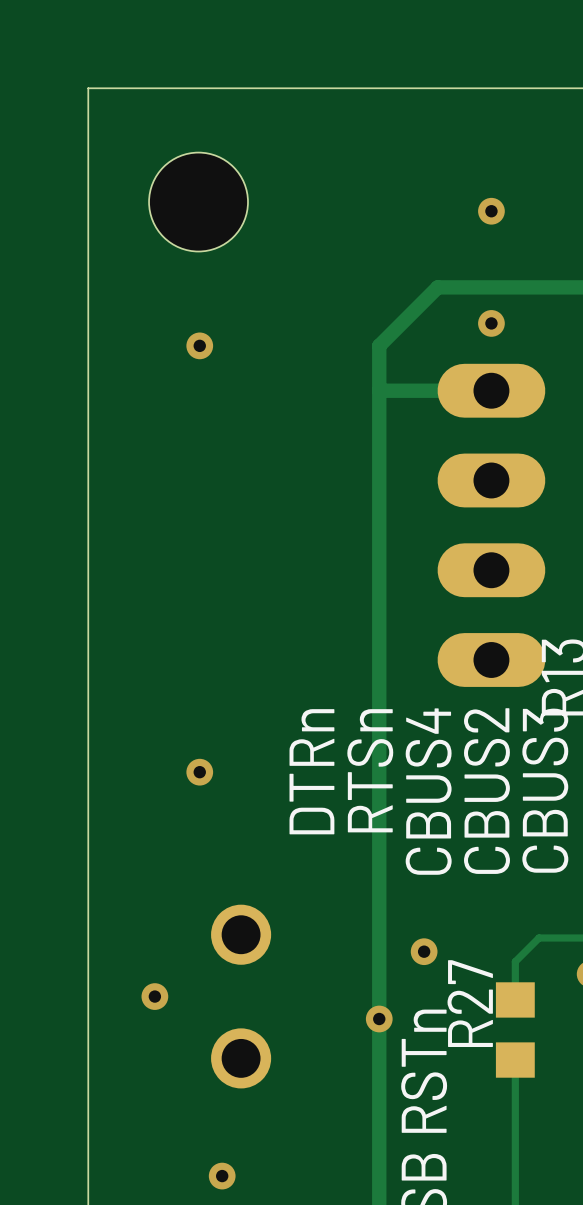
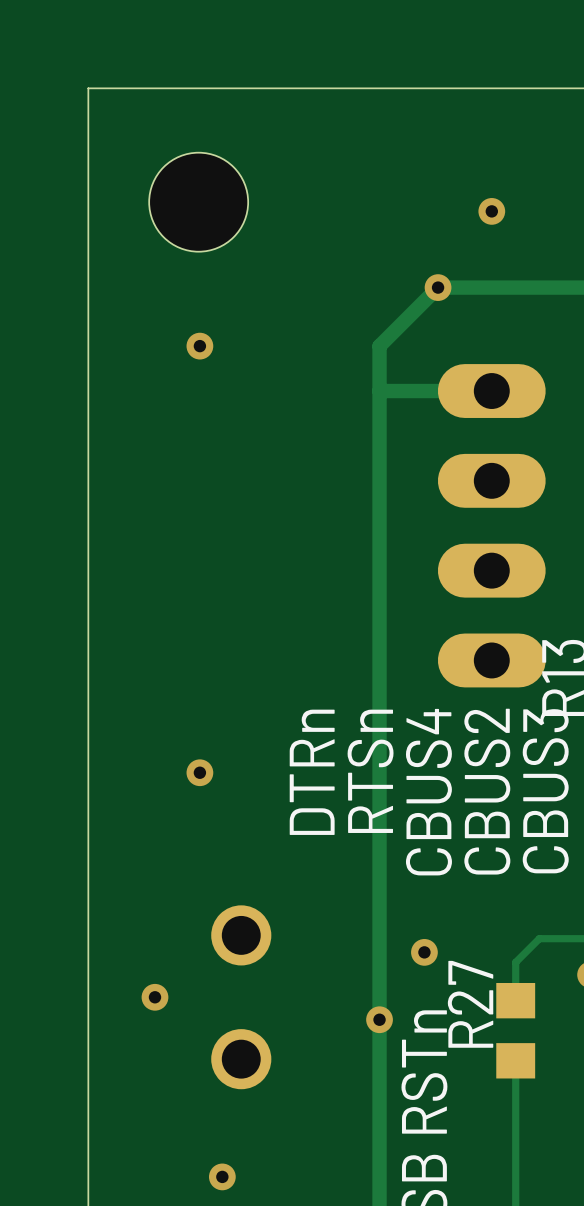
via position: (491, 323) -> (438, 287)

